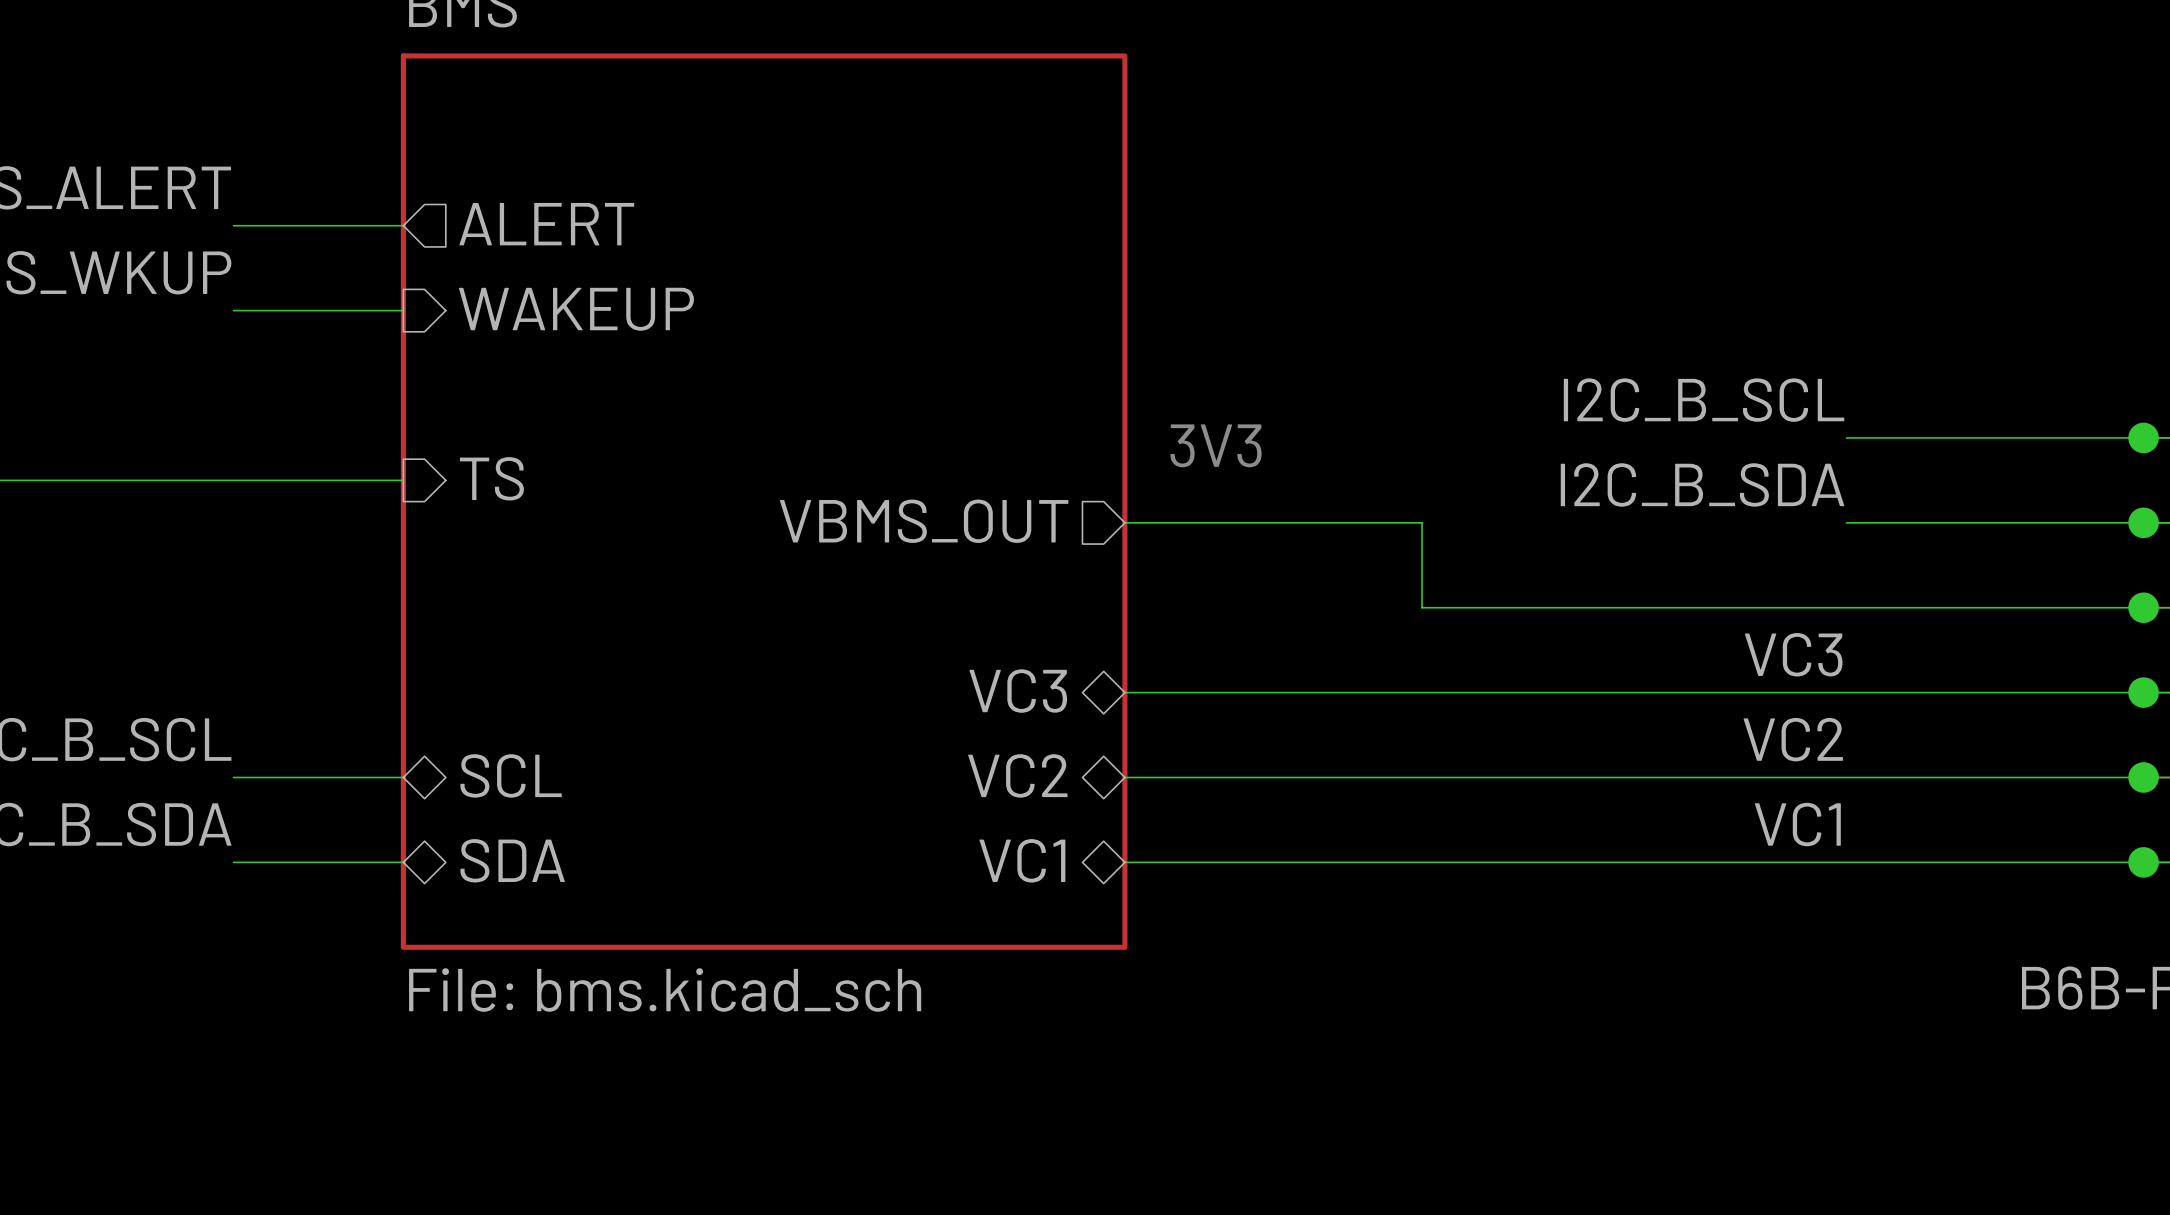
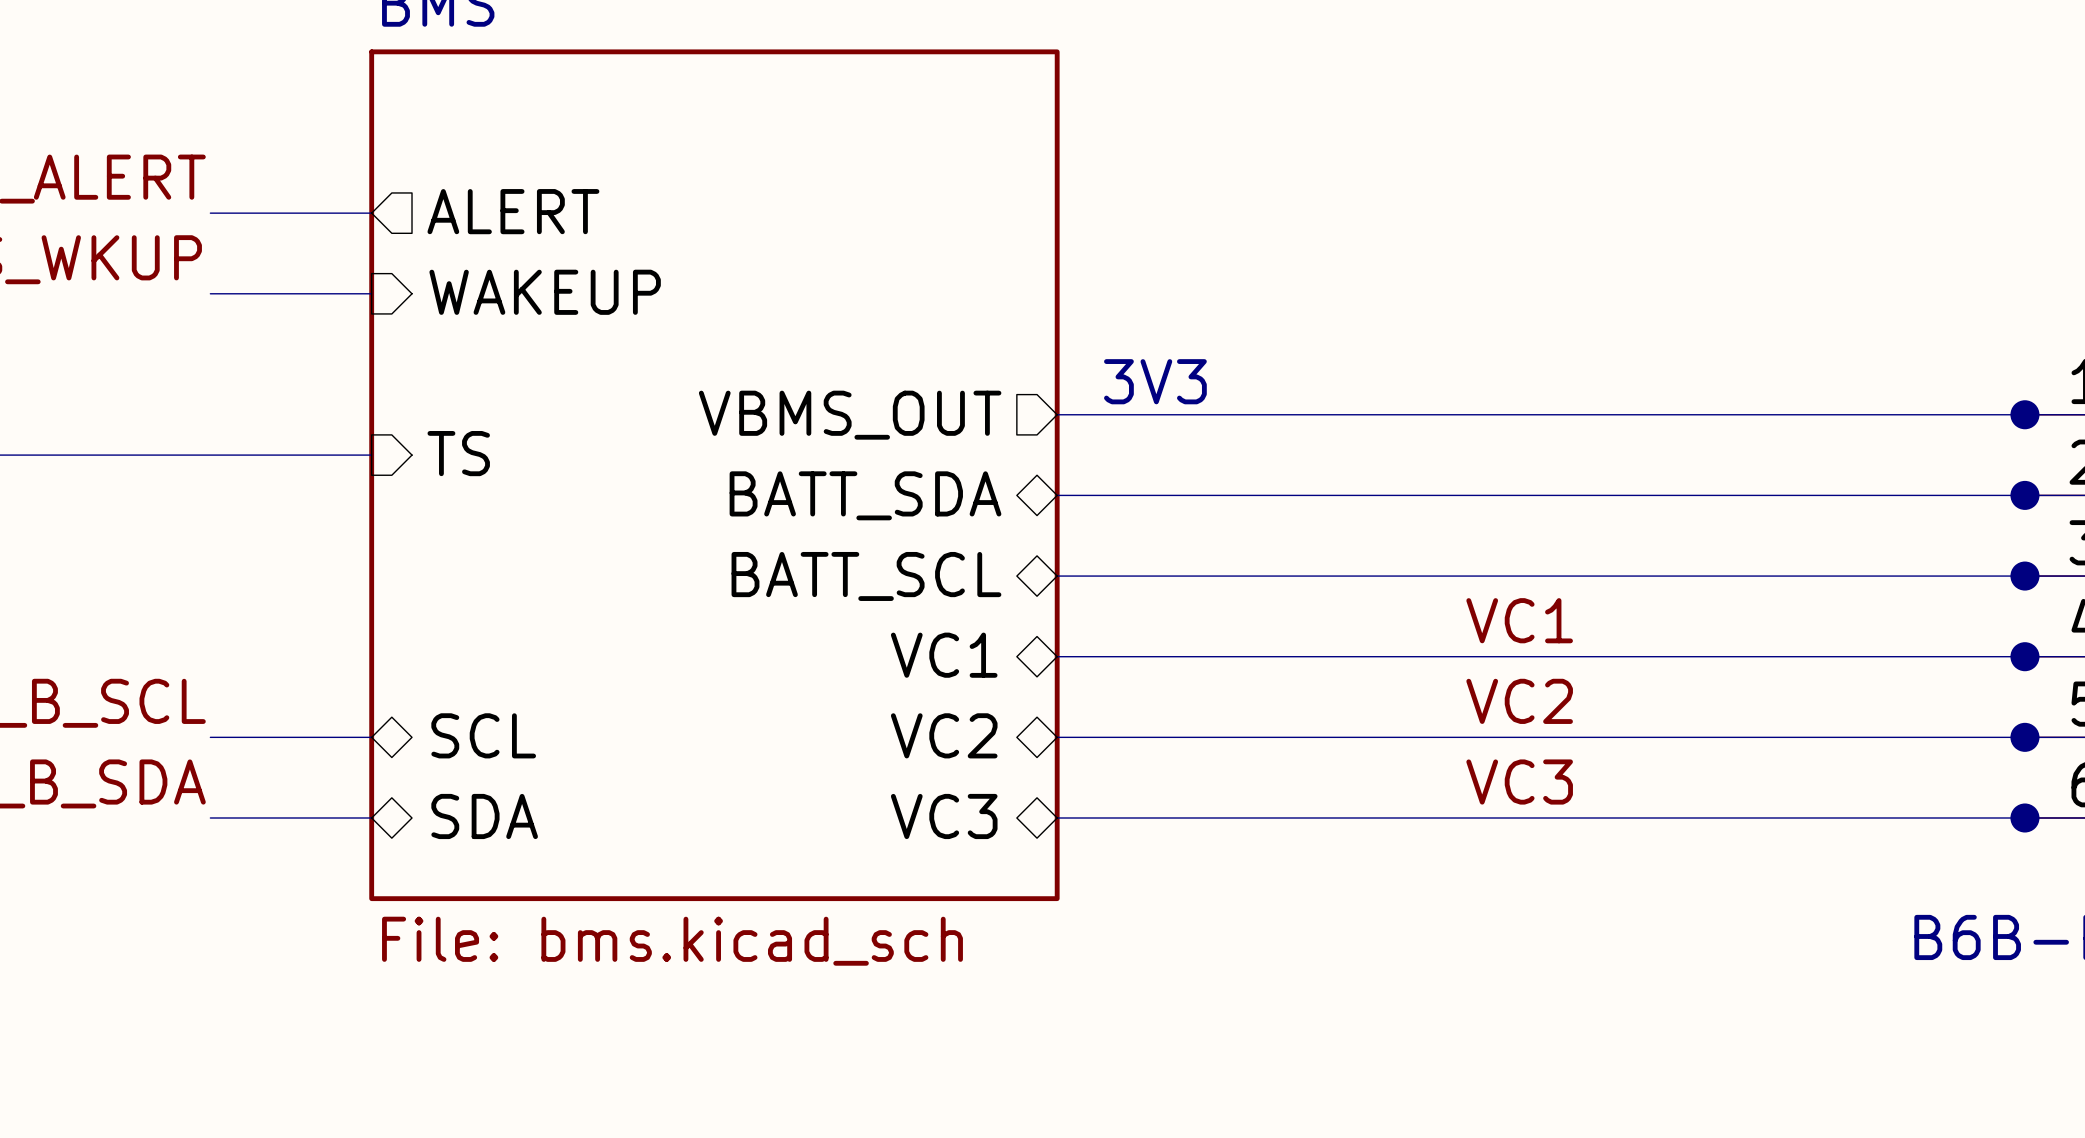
label: I2C_B_SCL (1704, 400) -> none
sheet pin: none -> VBMS_OUT (850, 415)
wire: none -> (1057, 414) (1742, 414)
text position: 3V3 (1215, 445) -> 3V3 (1155, 381)
label: I2C_B_SDA (1702, 484) -> none
sheet pin shape: output (924, 521) -> bidirectional (865, 495)
sheet pin: VBMS_OUT (924, 521) -> BATT_SDA (865, 495)
wire: (1422, 522) (1422, 607) -> (1057, 576) (1339, 576)
wire: none -> (1339, 495) (1742, 495)
sheet pin: none -> BATT_SCL (866, 576)
label position: VC3 (1793, 654) -> VC3 (1519, 782)
sheet pin: VC3 (1018, 691) -> VC1 (944, 655)
label position: VC2 (1793, 739) -> VC2 (1519, 701)
label position: VC1 (1797, 824) -> VC1 (1519, 620)
sheet pin: VC1 (1022, 860) -> VC3 (944, 816)

